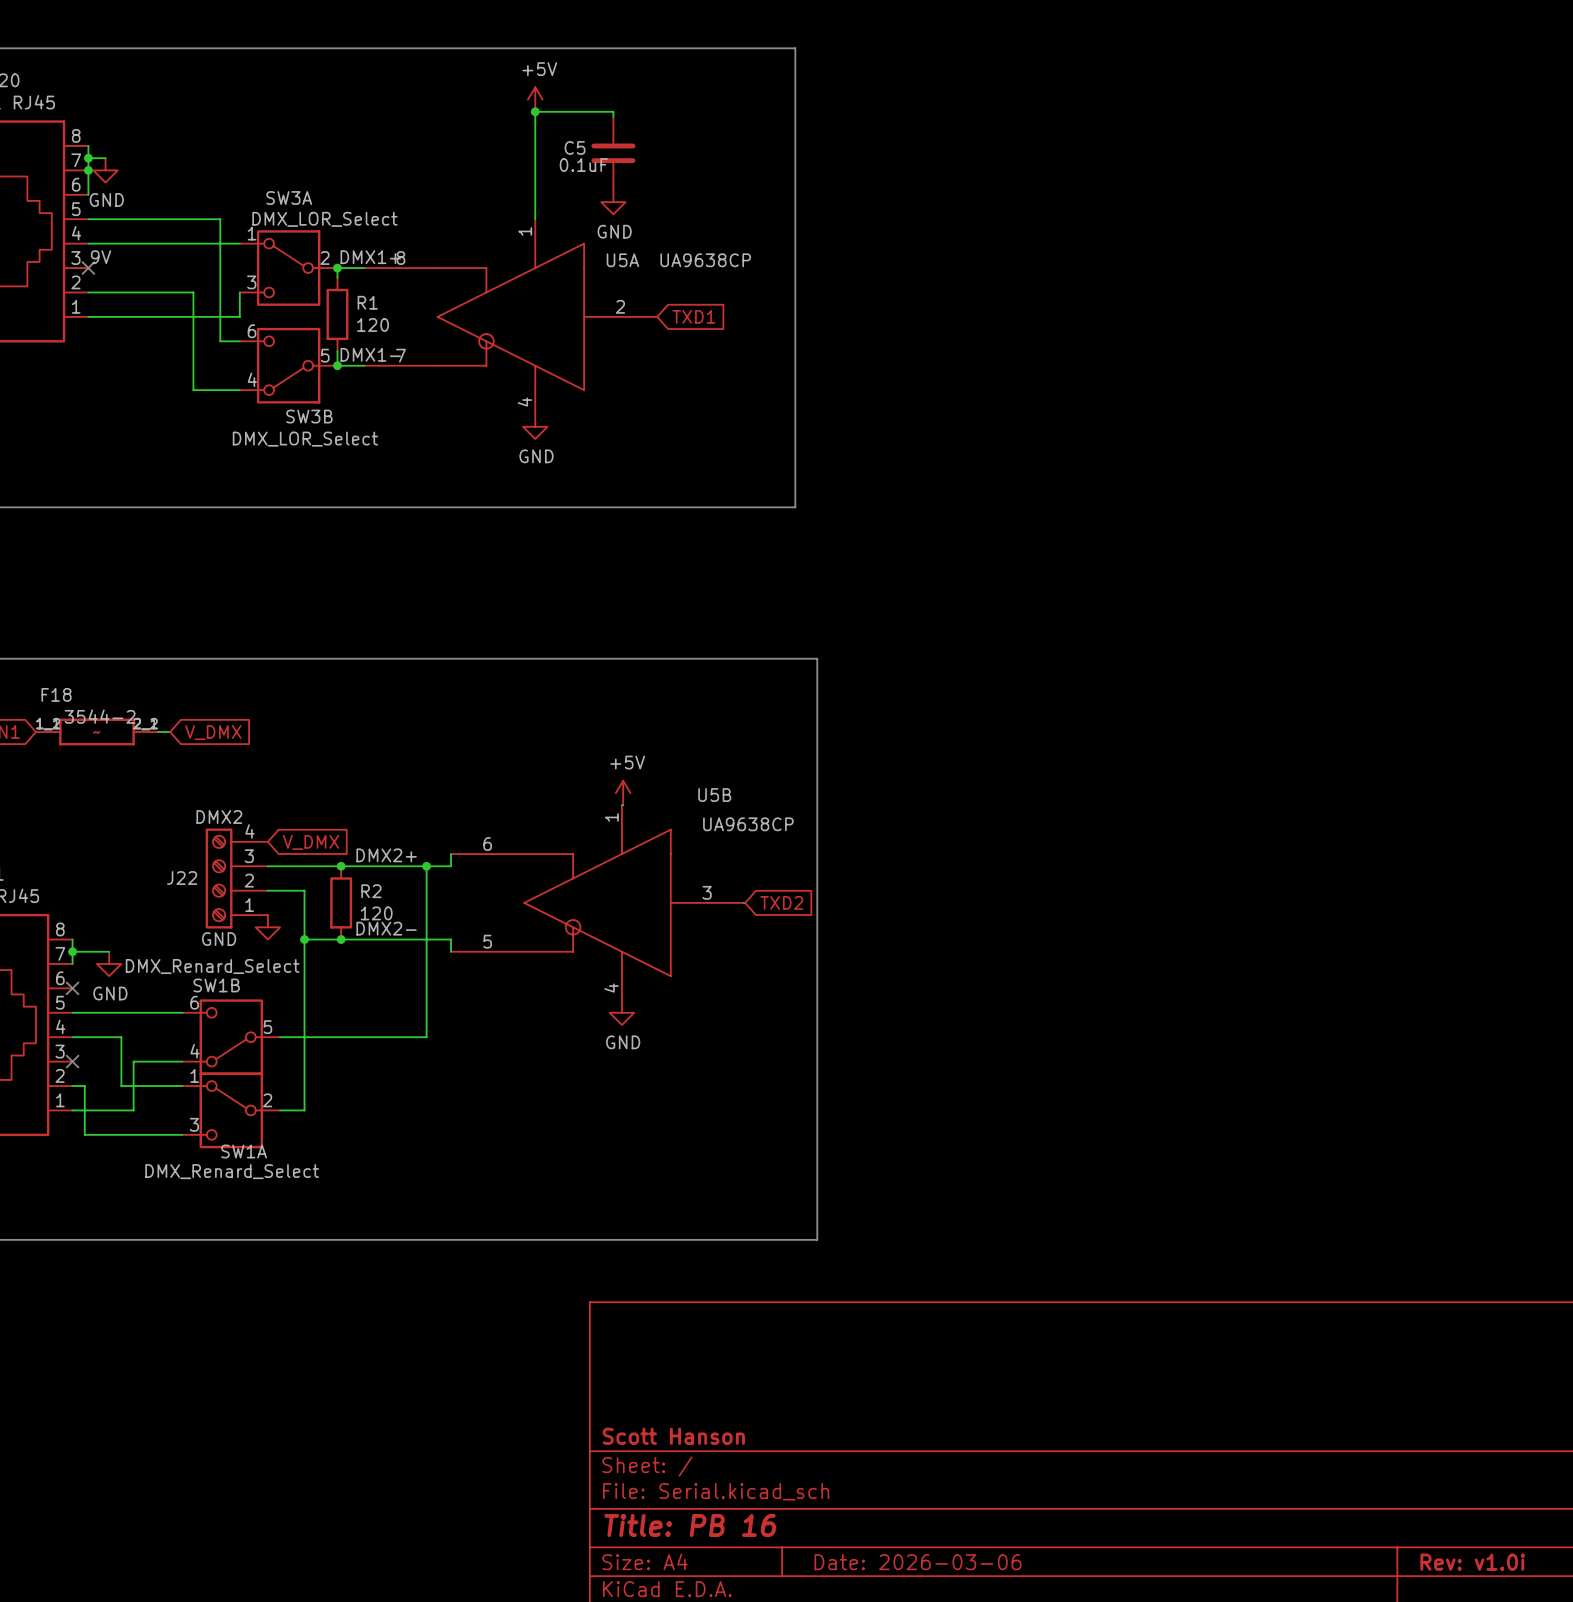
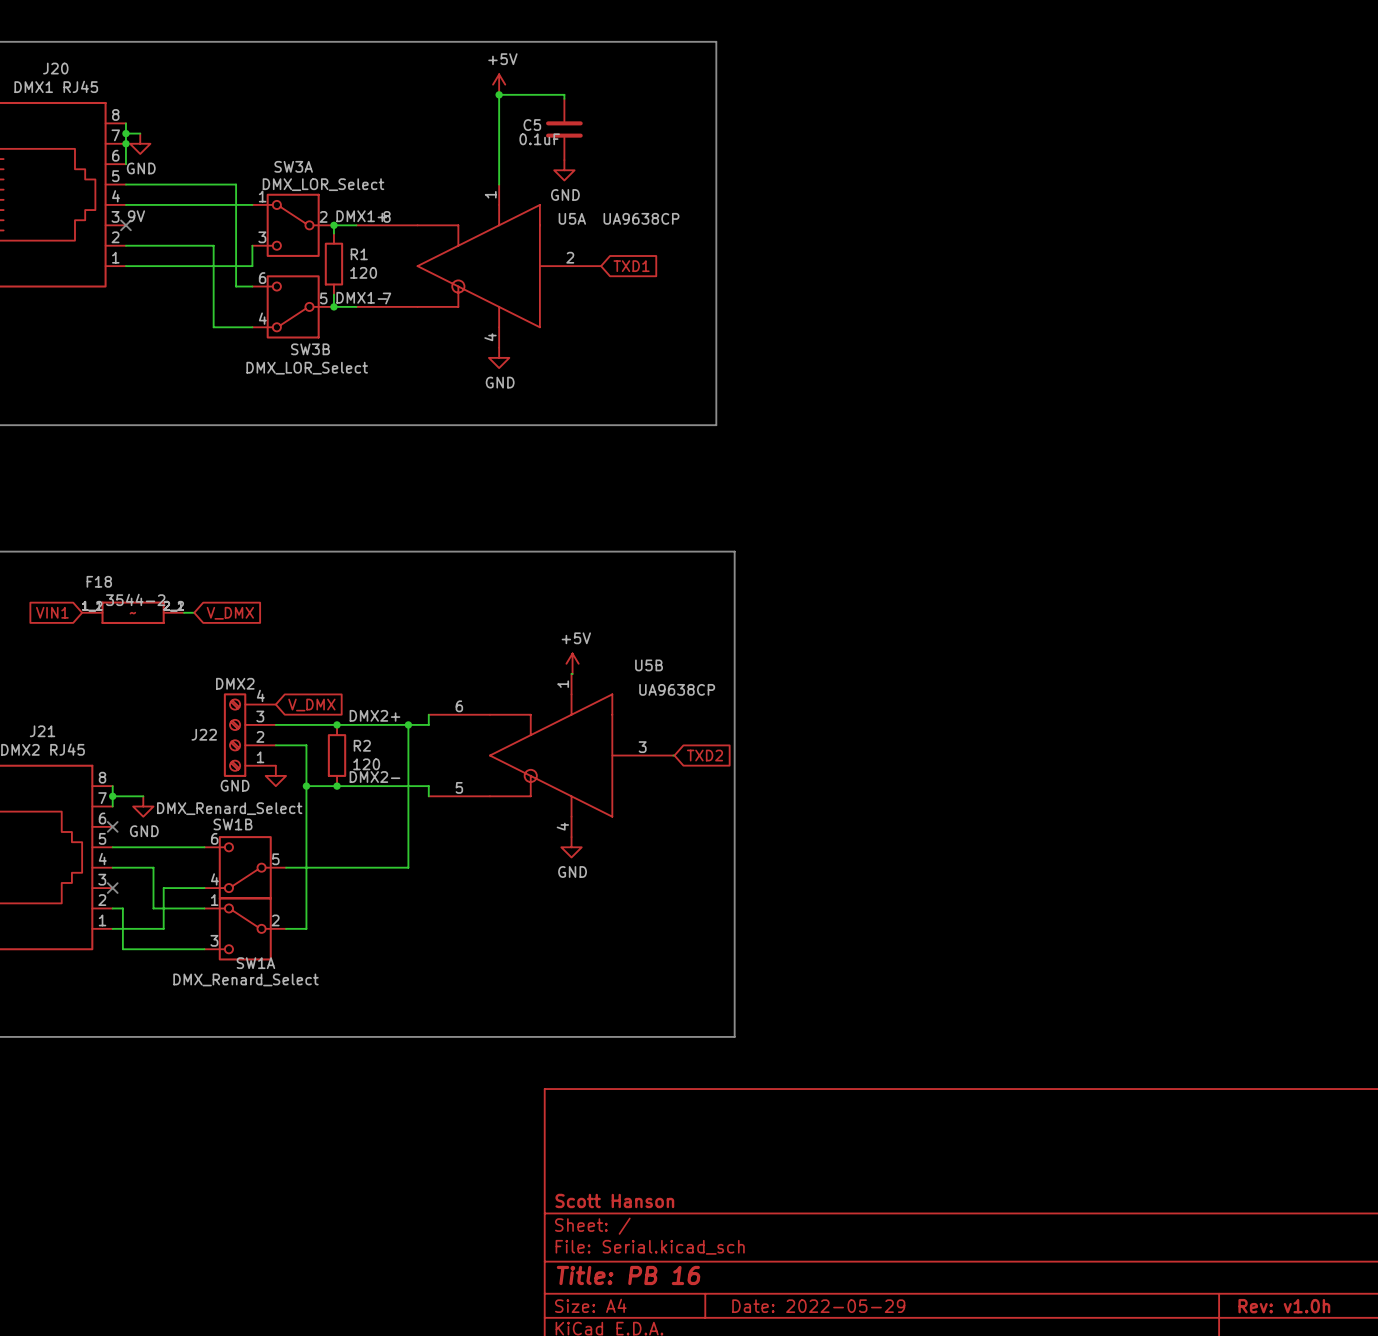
title block: Date: 2026-03-06 (917, 1562) -> Date: 2022-05-29 (818, 1306)
title block: Rev: v1.0i (1472, 1562) -> Rev: v1.0h (1284, 1306)

